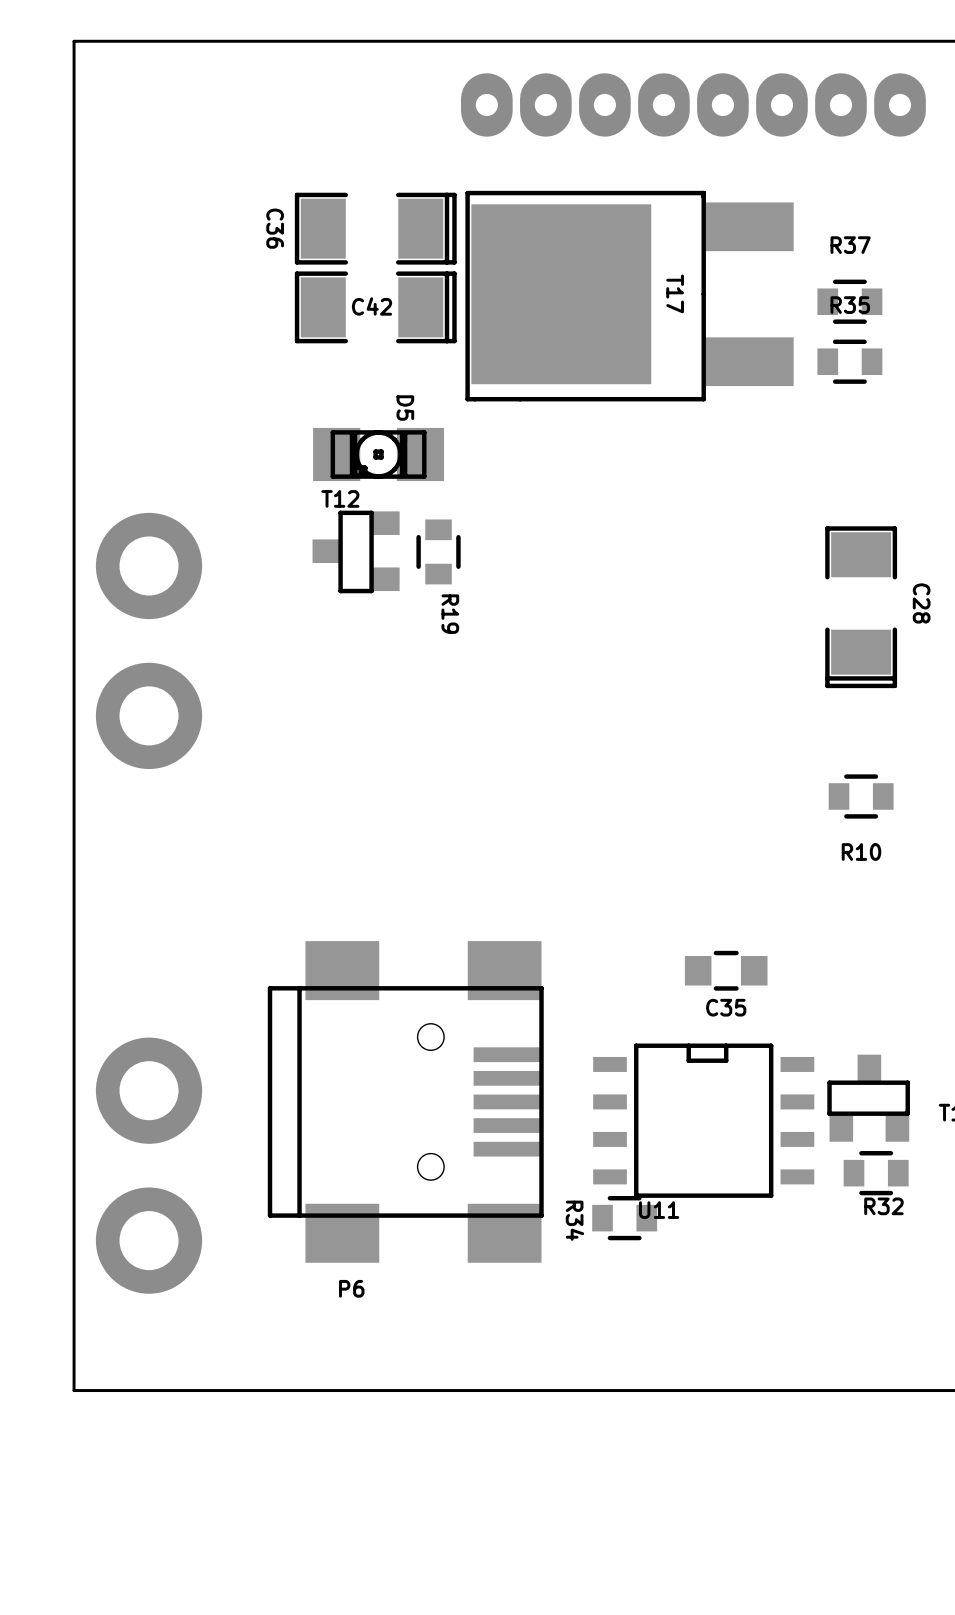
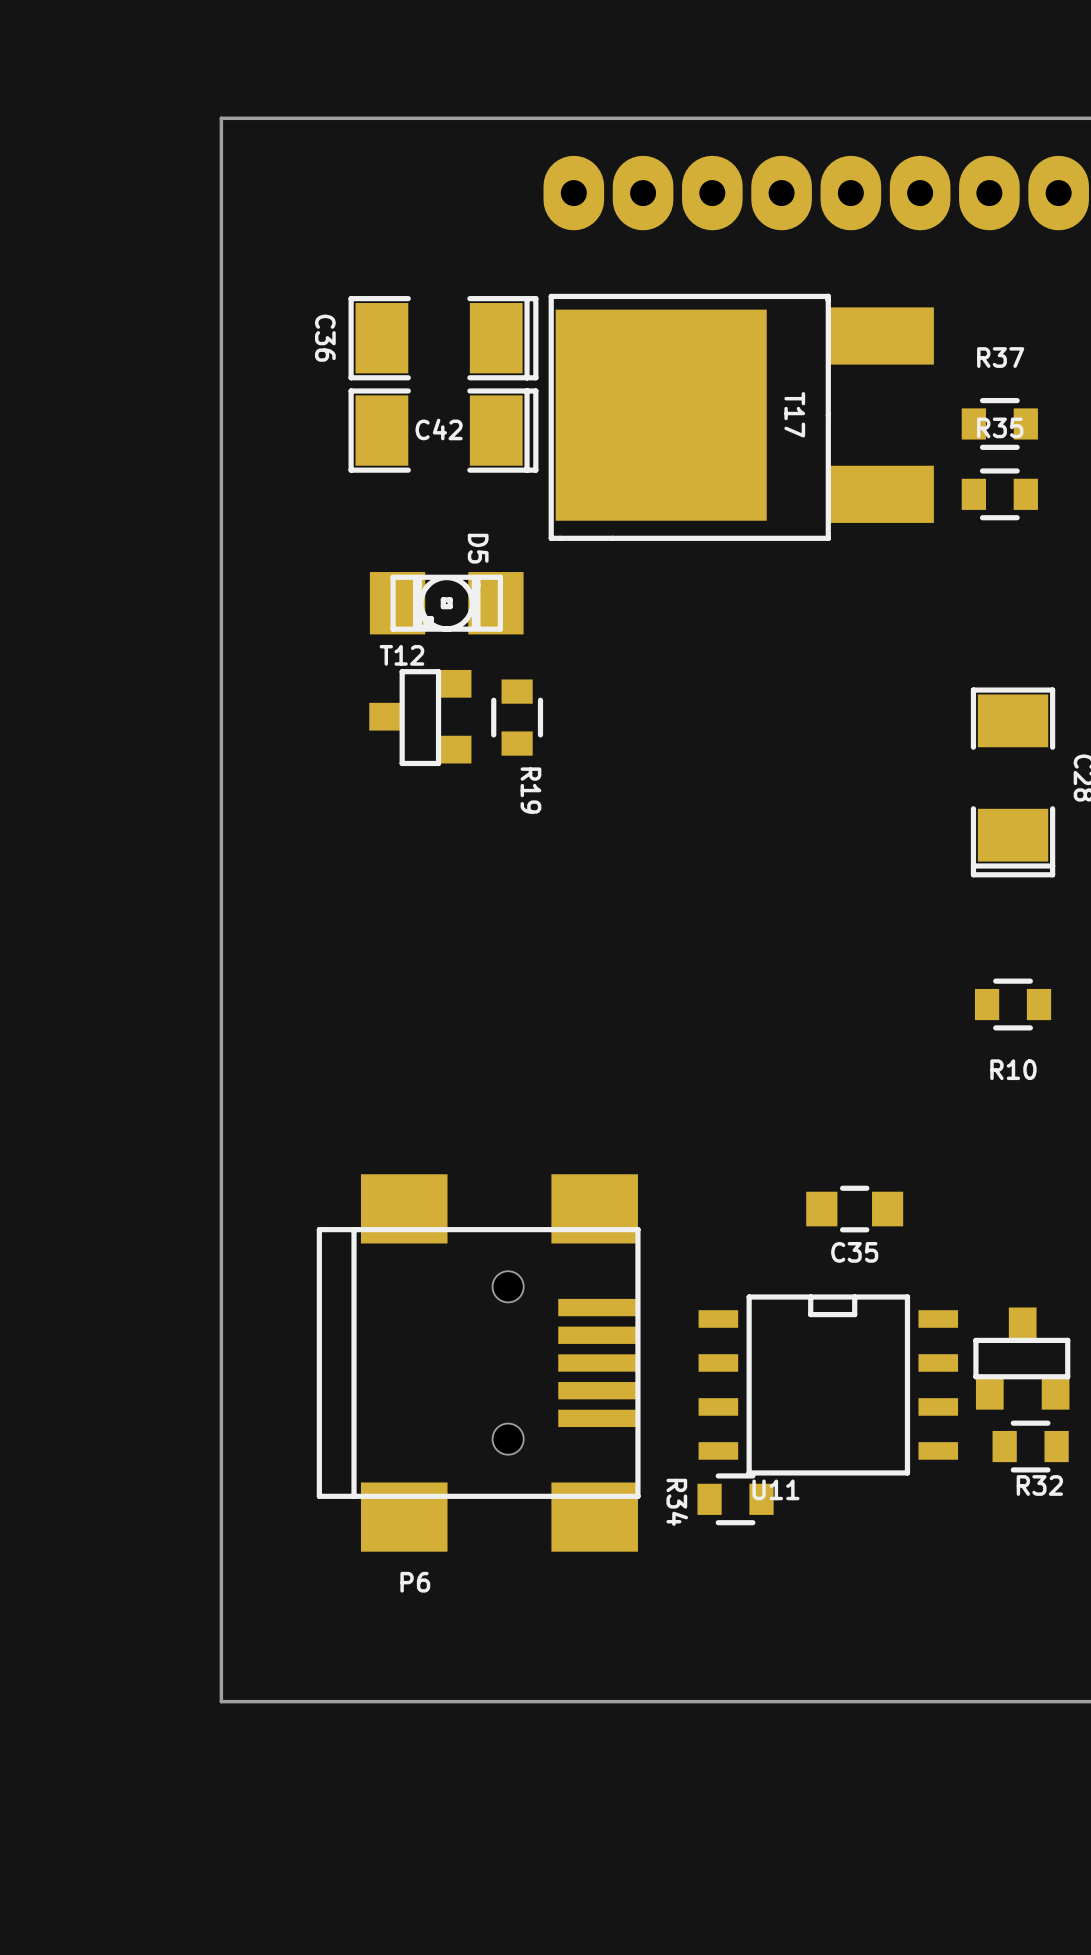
board edge: (186, 41) (74, 41) (74, 1390) (186, 1390) -> (221, 118) (221, 1701)
part: (149, 565) -> none
part: (149, 715) -> none
part: (149, 1090) -> none
part: (149, 1240) -> none

